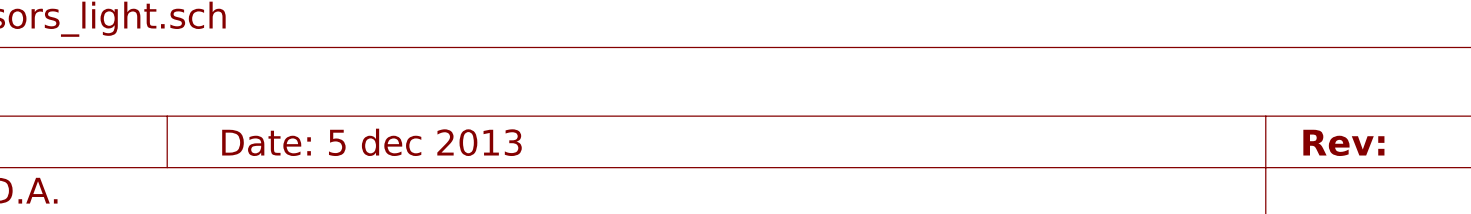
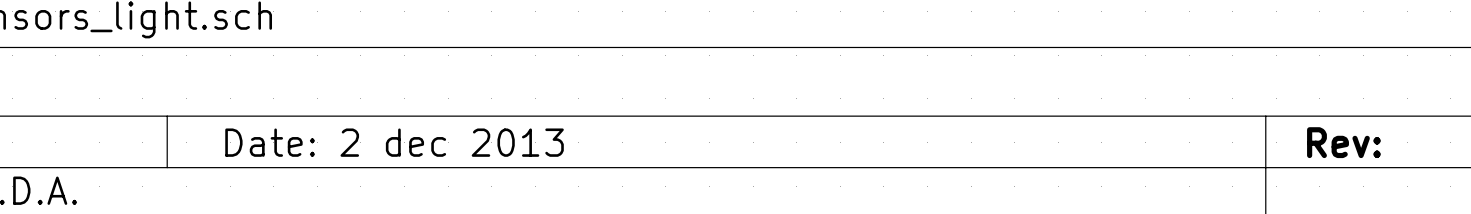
title block: Date: 5 dec 2013 (371, 142) -> Date: 2 dec 2013 (394, 142)

